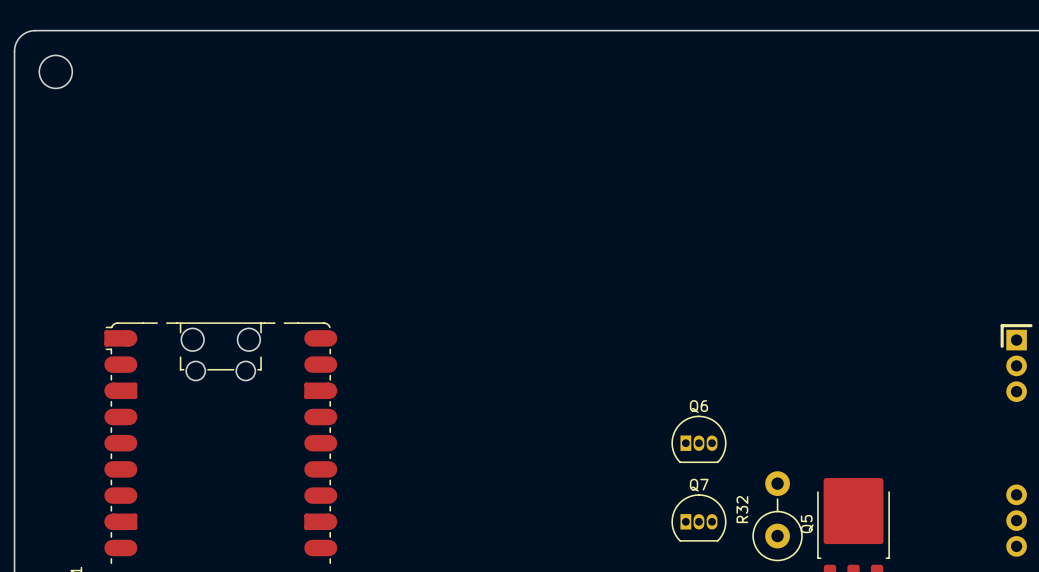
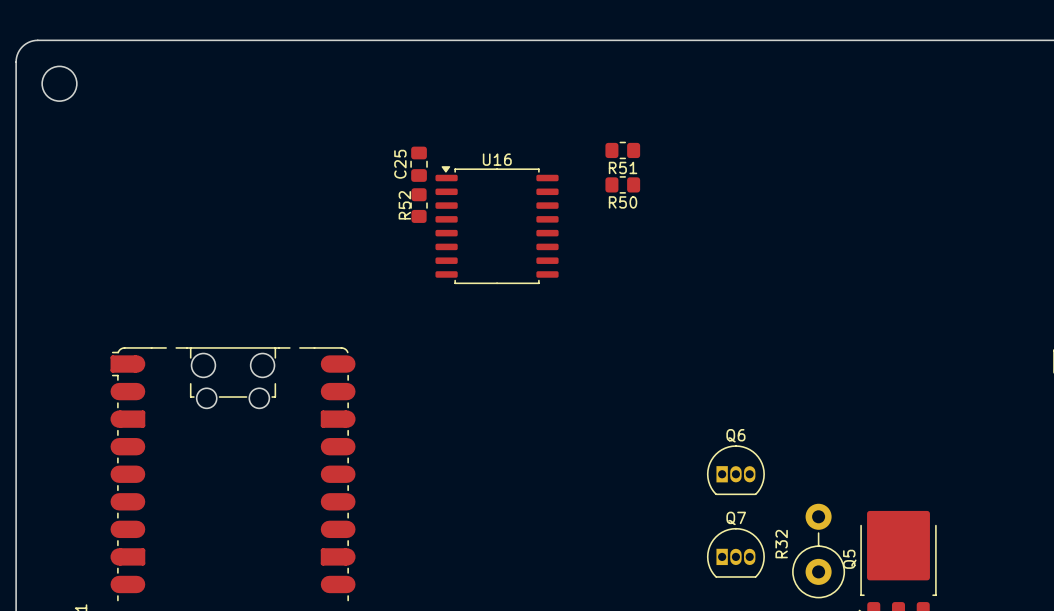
R51: none -> (622, 150)
C25: none -> (419, 164)
R50: none -> (622, 184)
R52: none -> (419, 205)
U16: none -> (497, 225)

